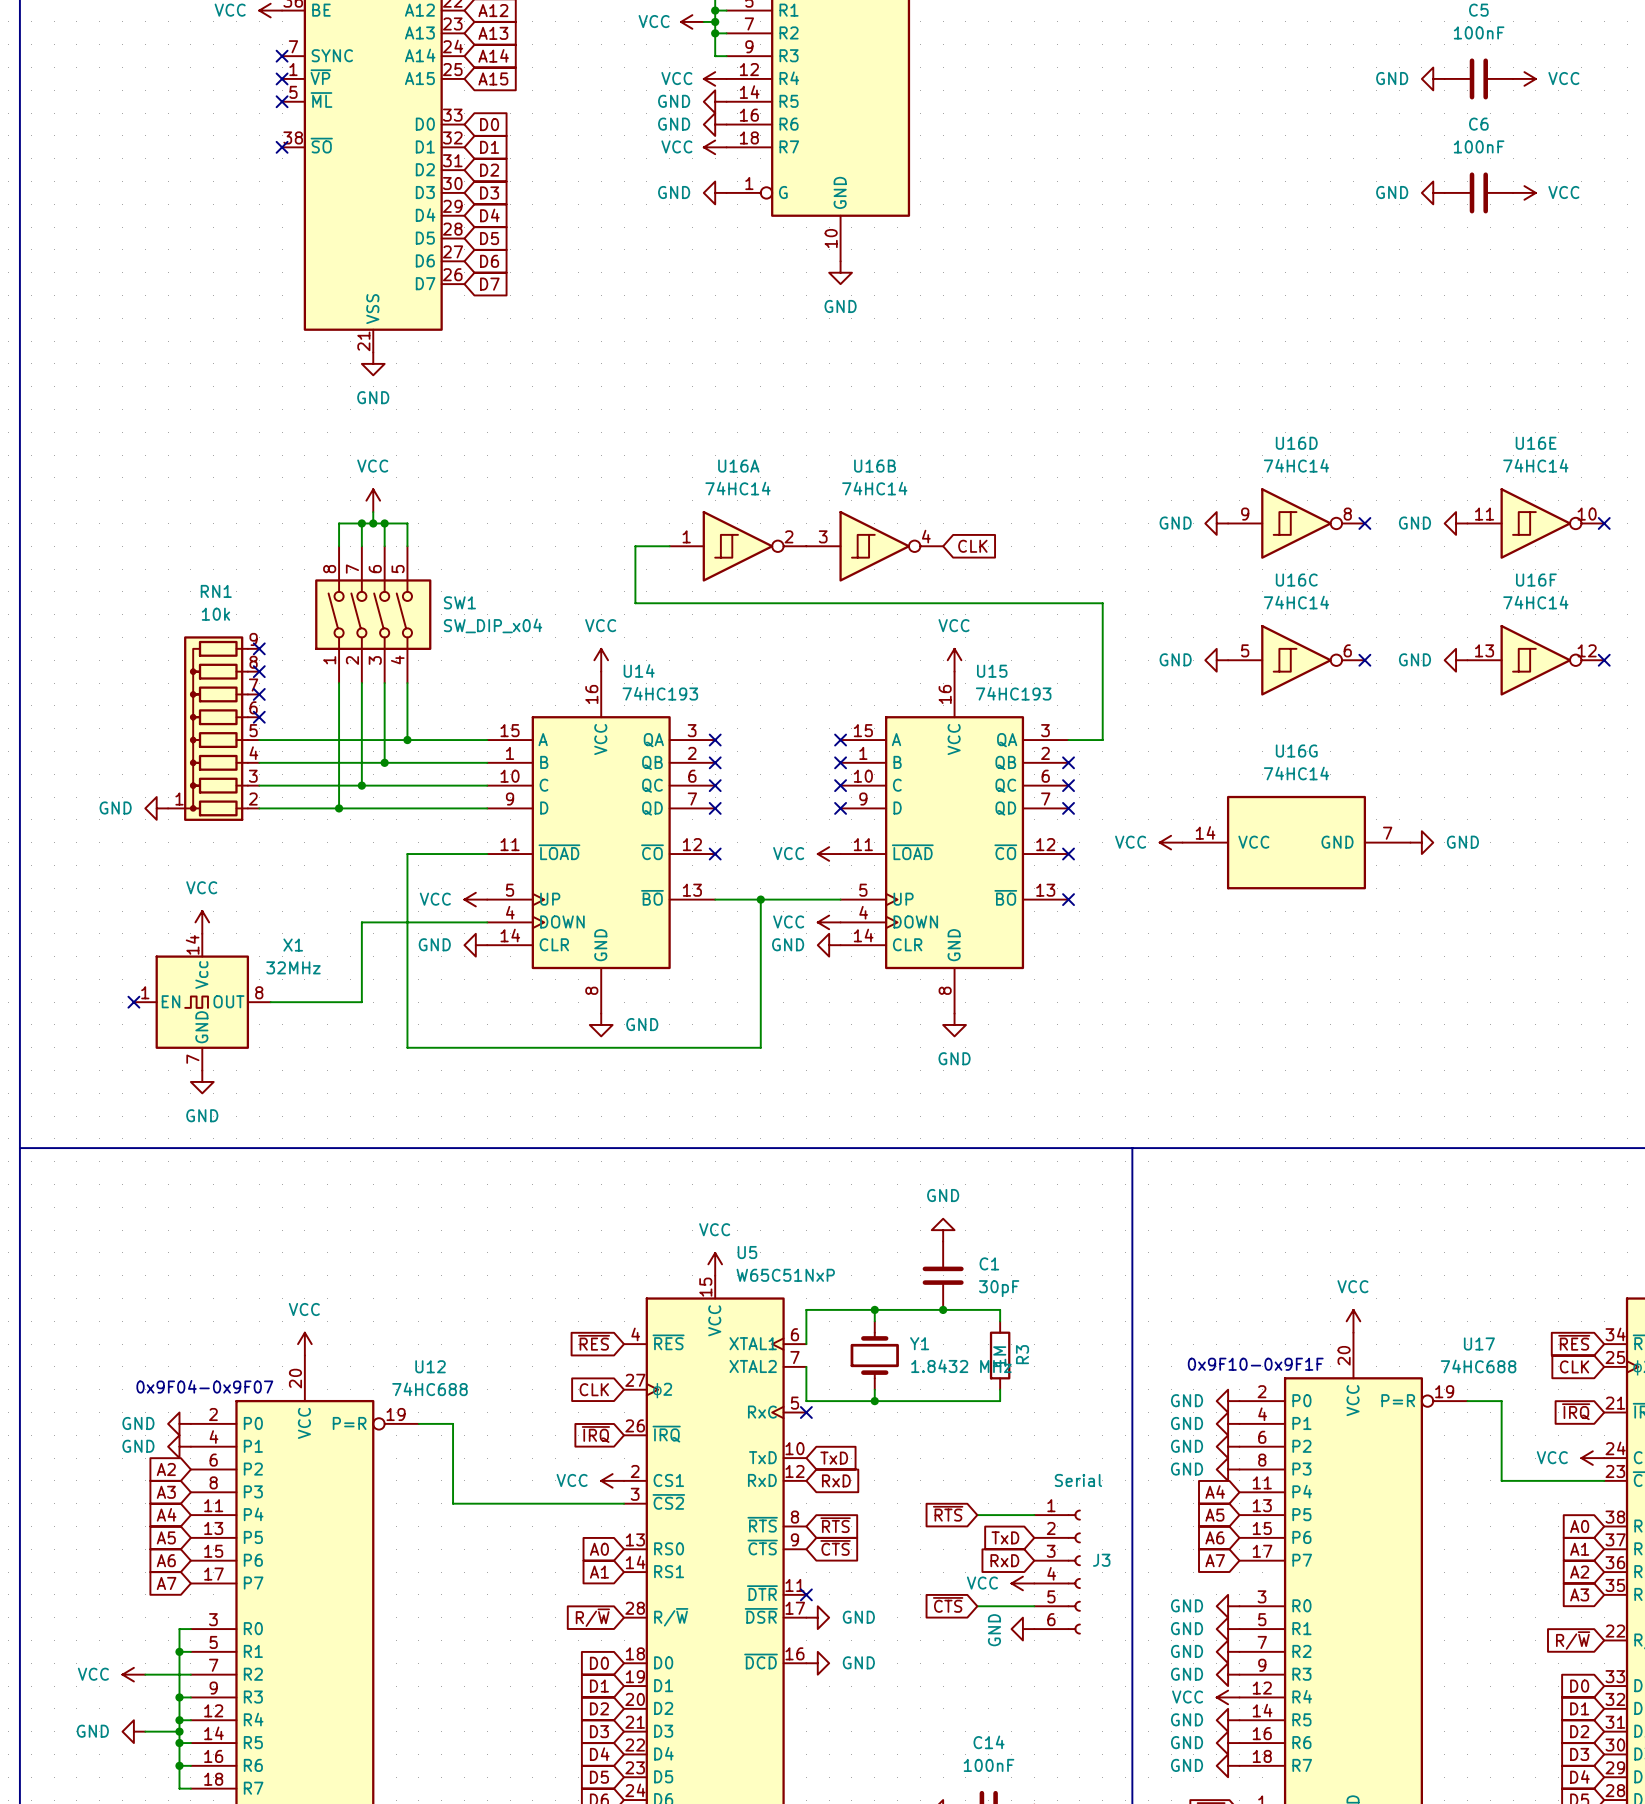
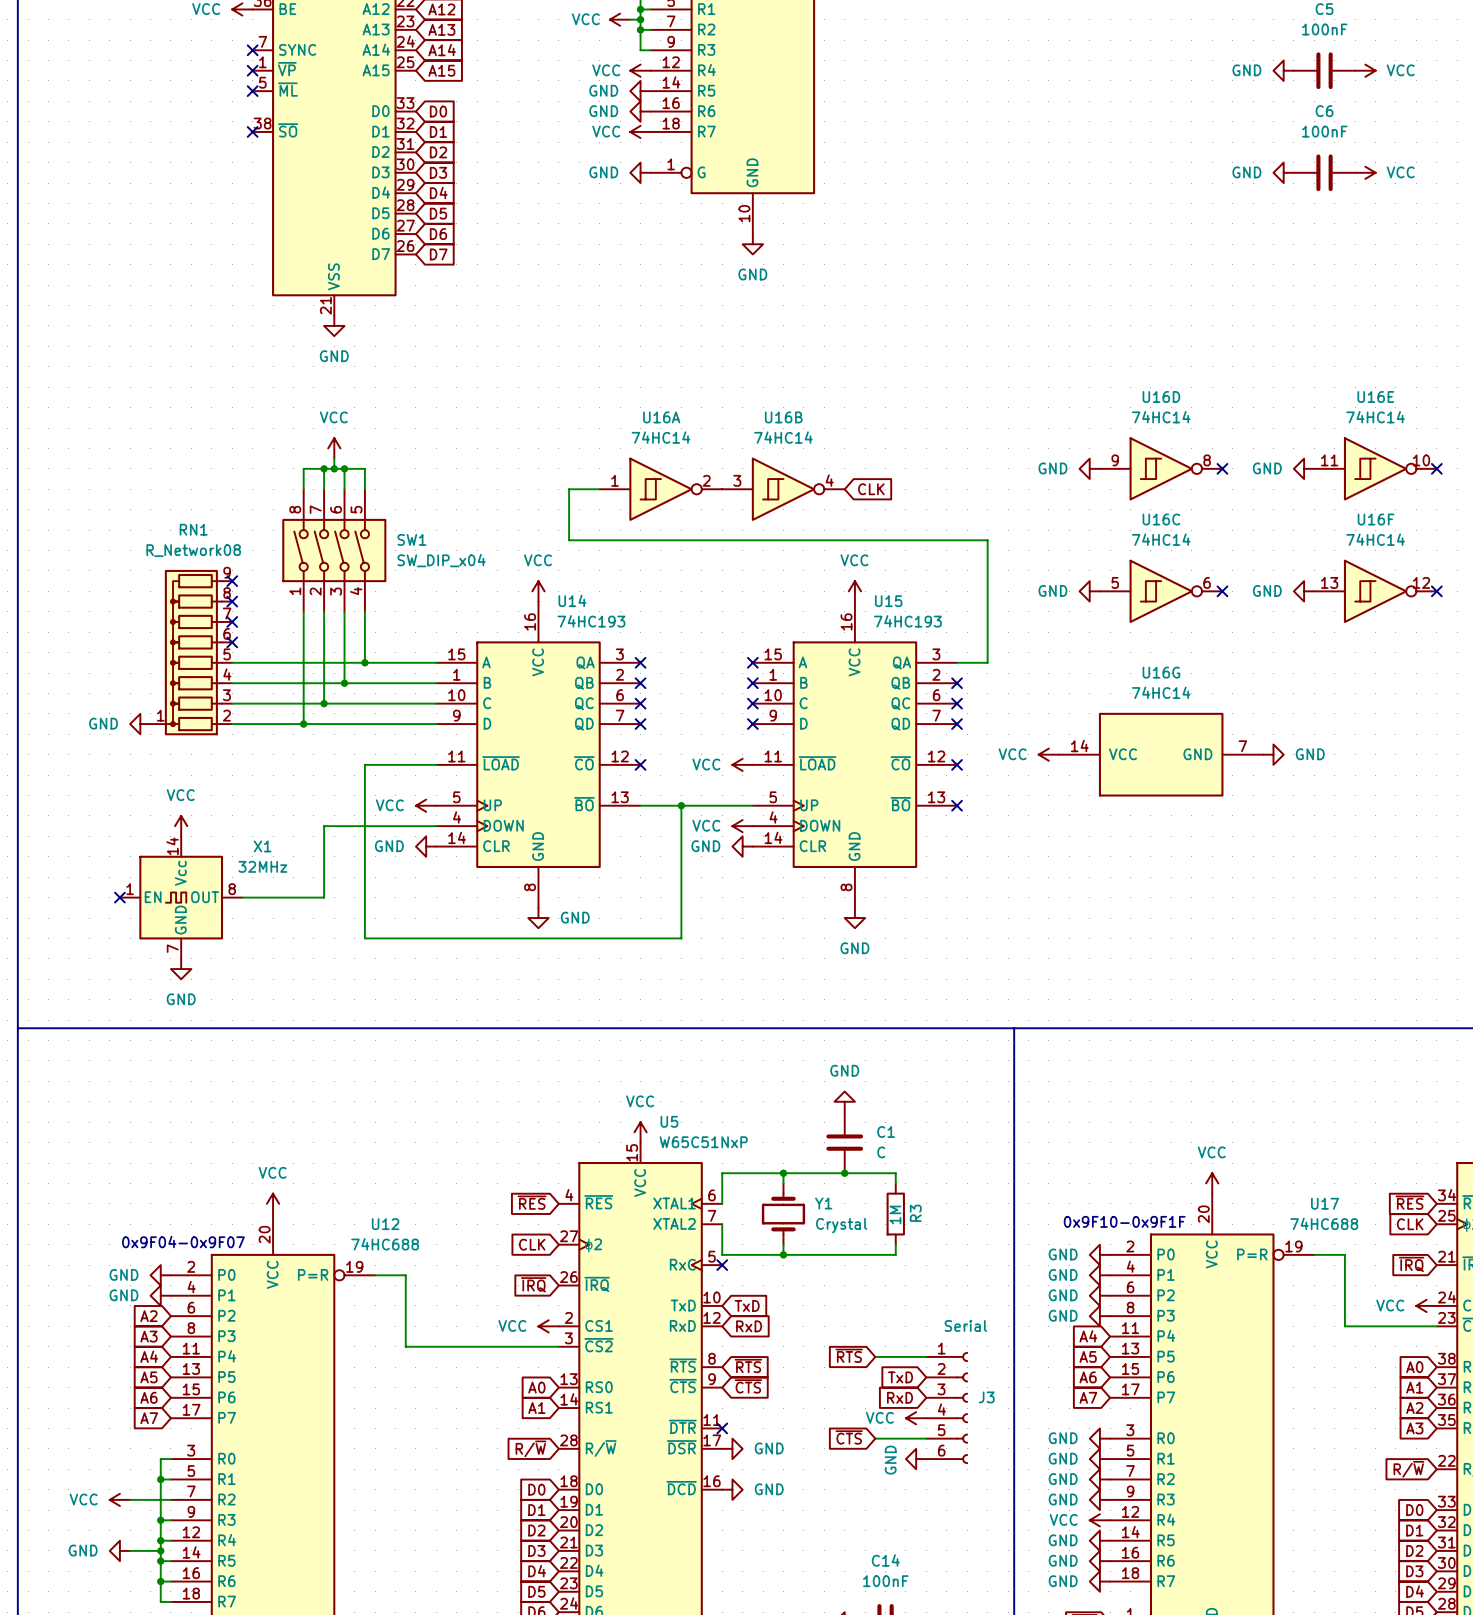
RN1 value: 10k (215, 614) -> R_Network08 (193, 550)
C1 value: 30pF (999, 1288) -> C (881, 1152)
Y1 value: 1.8432 MHz (961, 1366) -> Crystal (841, 1225)

